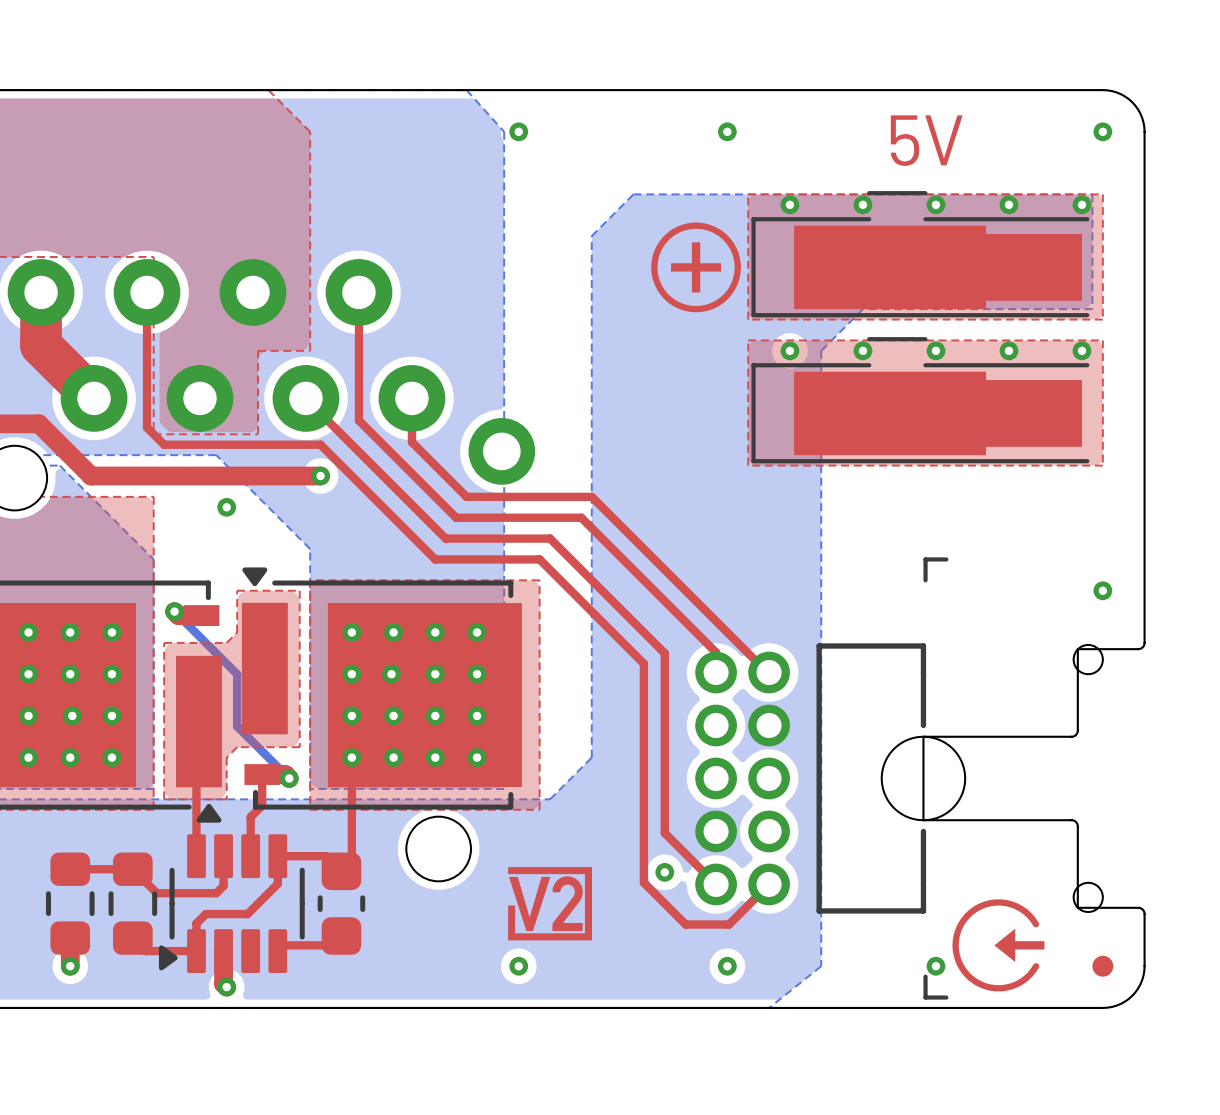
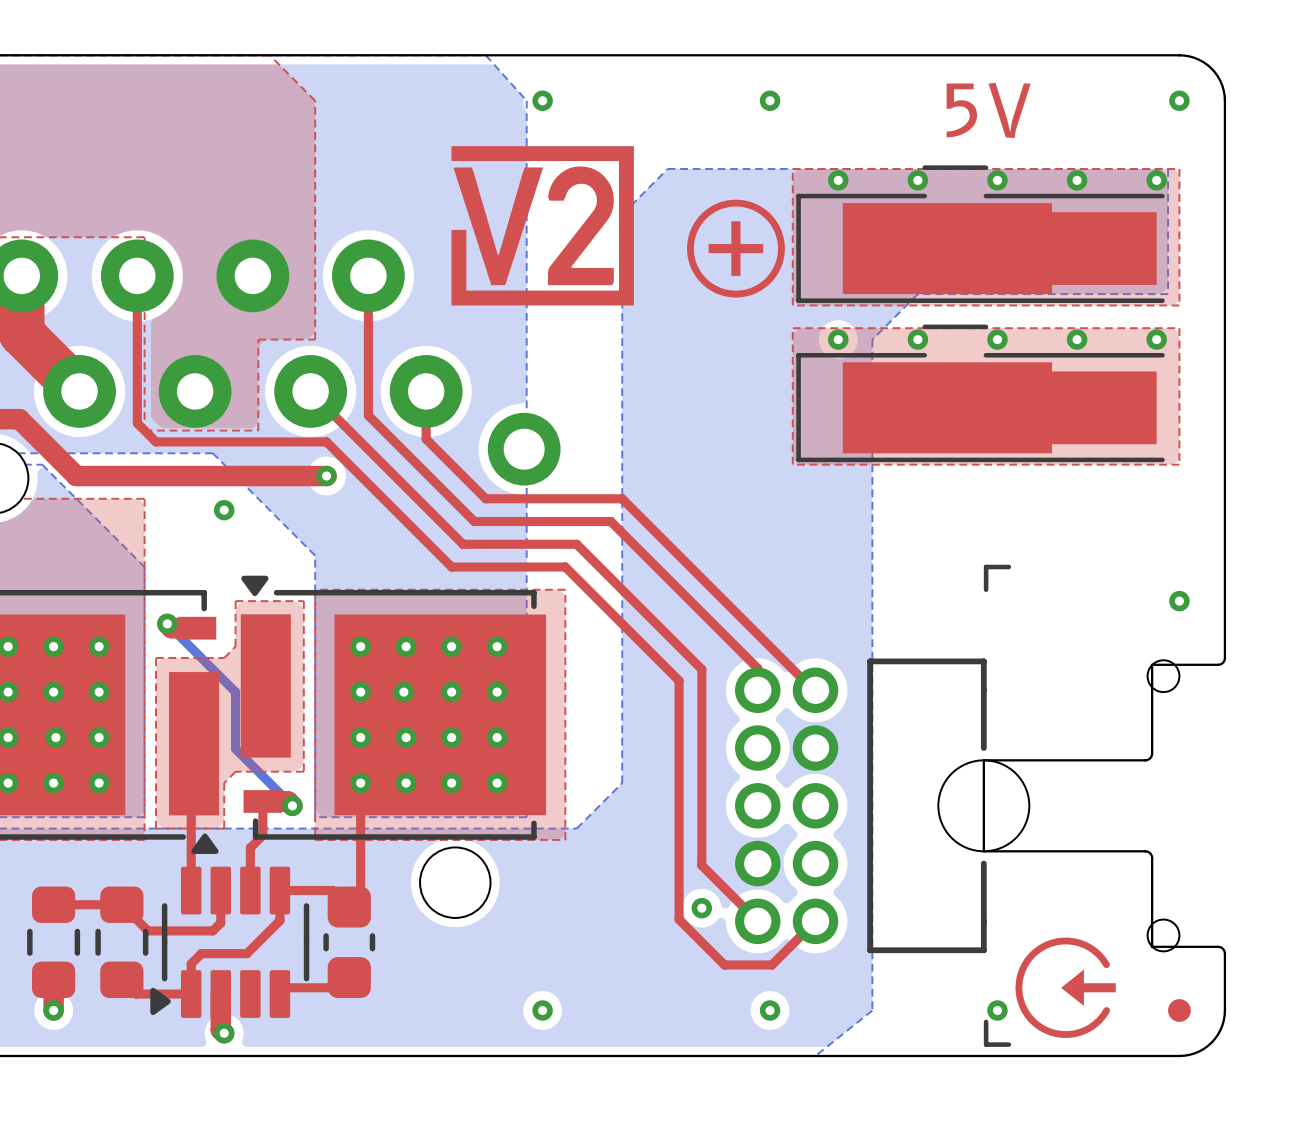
drawing: none -> [451, 146, 634, 306]
drawing: [508, 867, 592, 941] -> none

